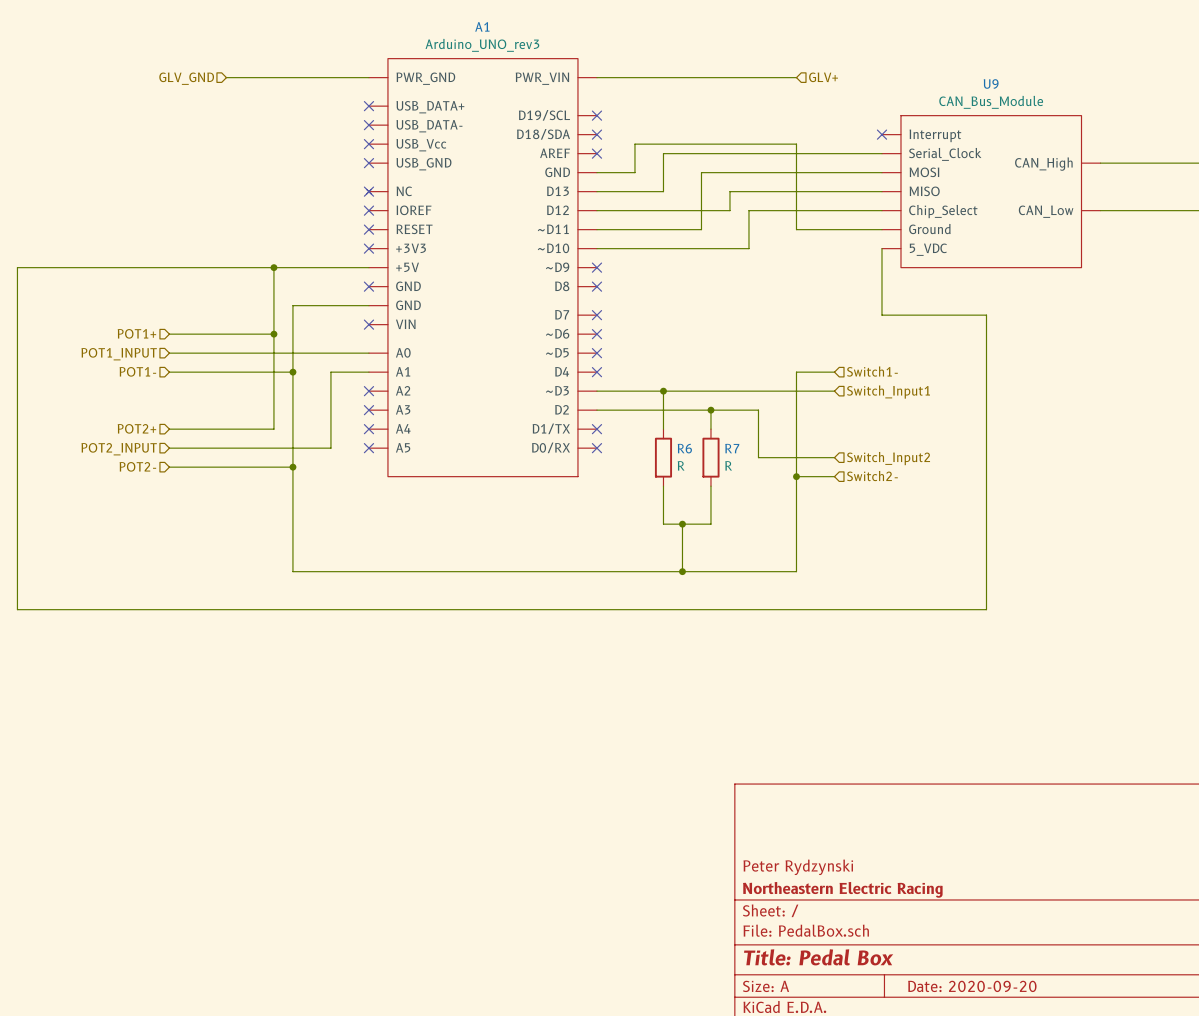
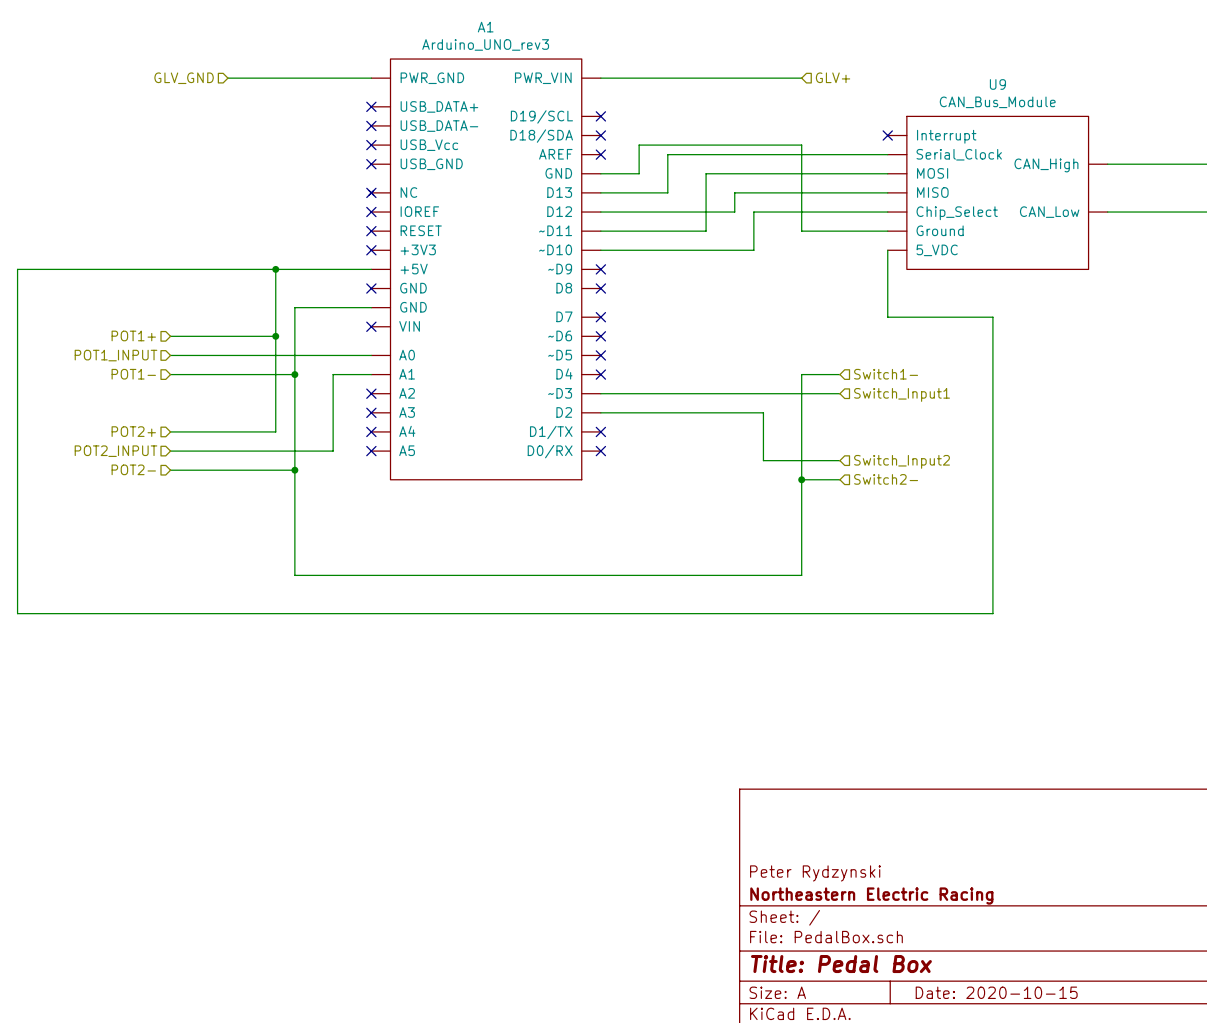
wire: (663, 391) (663, 429) -> none
junction: (663, 391) -> none
wire: (710, 410) (710, 429) -> none
junction: (710, 410) -> none
R6: R (663, 457) -> none
R7: R (710, 457) -> none
wire: (663, 486) (663, 524) (710, 524) (710, 486) -> none
wire: (682, 524) (682, 571) -> none
junction: (682, 524) -> none
junction: (682, 571) -> none
title block: Date: 2020-09-20 (972, 986) -> Date: 2020-10-15 (996, 992)

